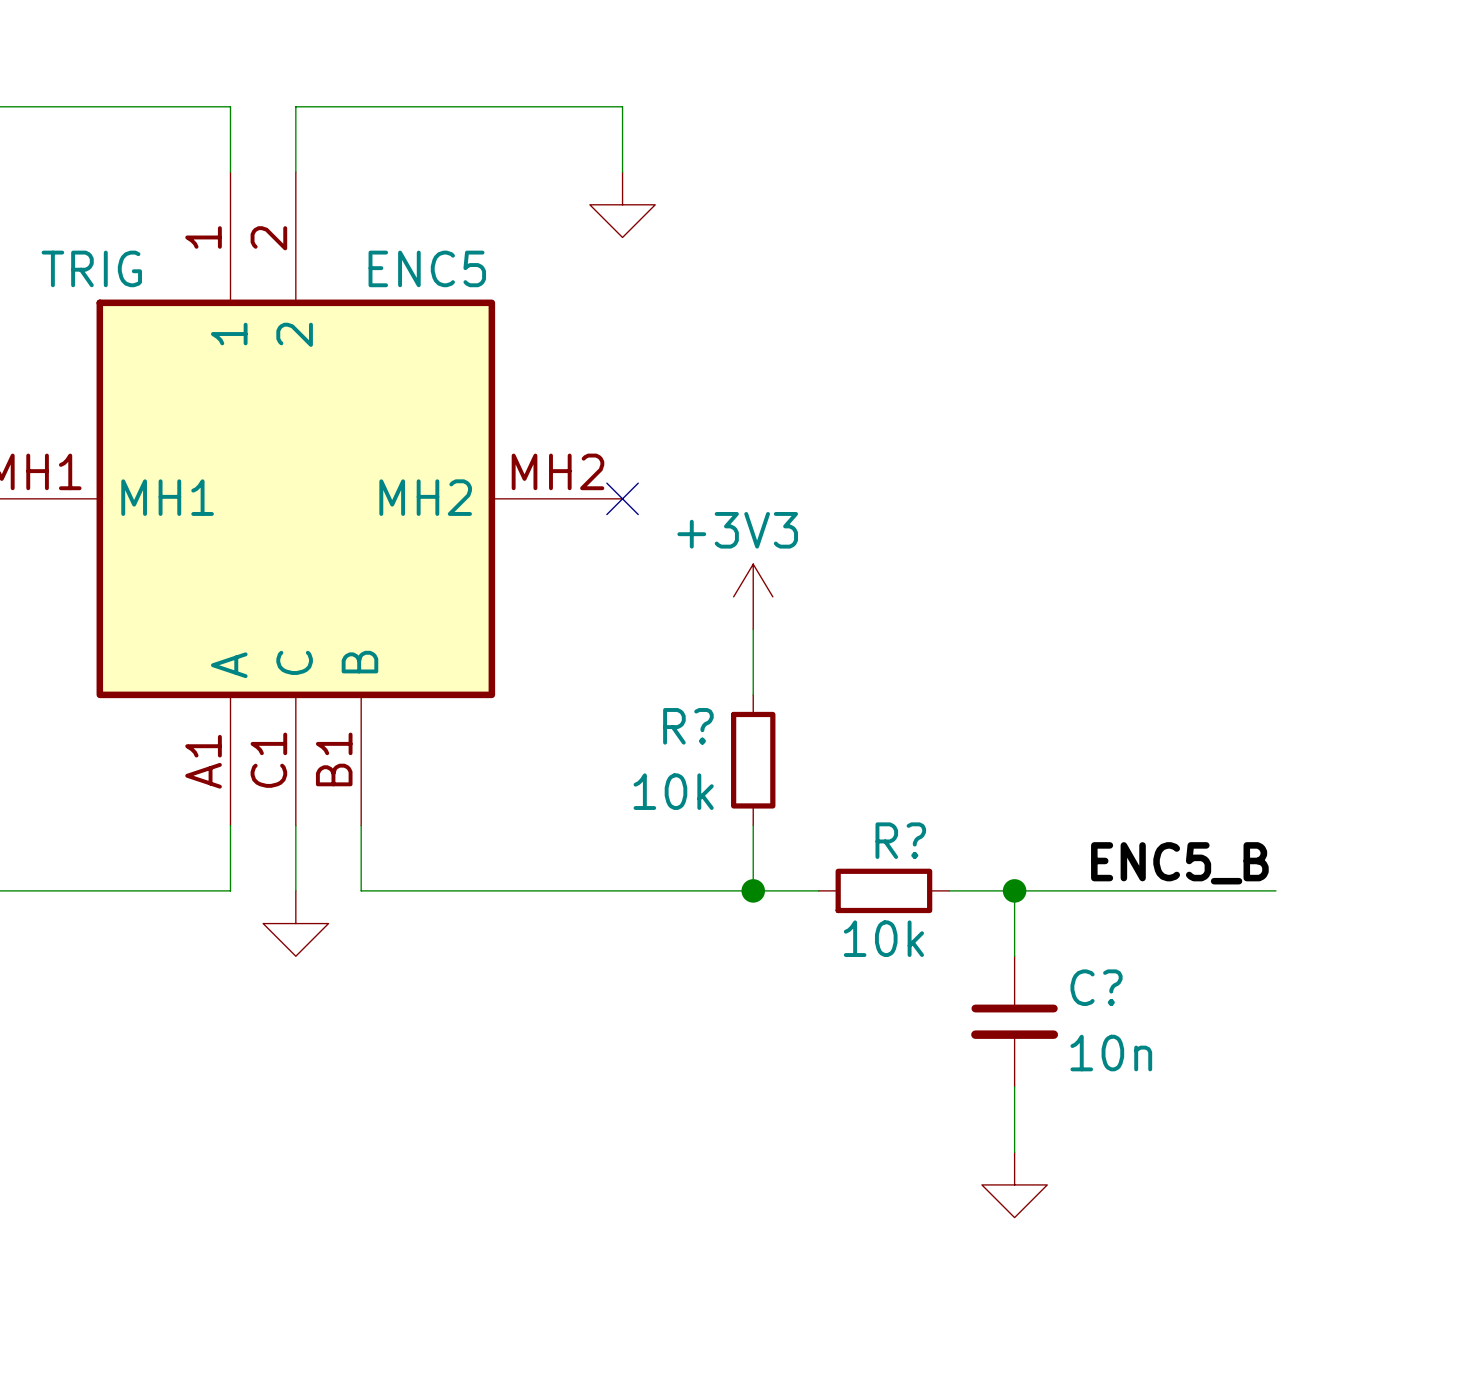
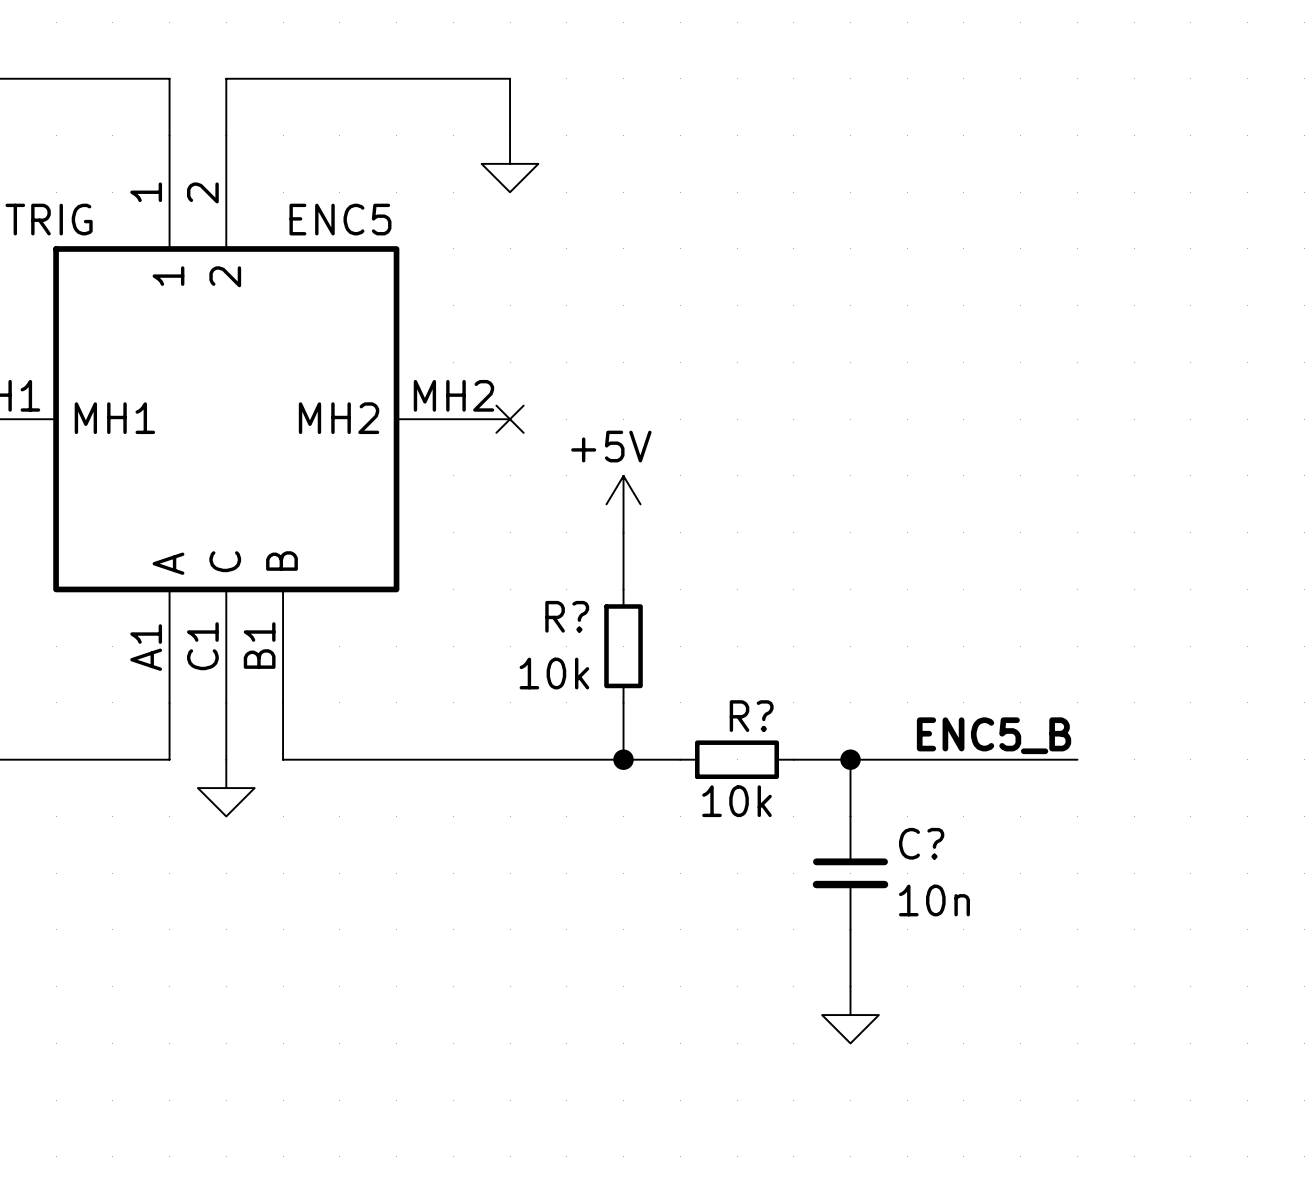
power symbol: +3V3 (753, 596) -> +5V (623, 504)

